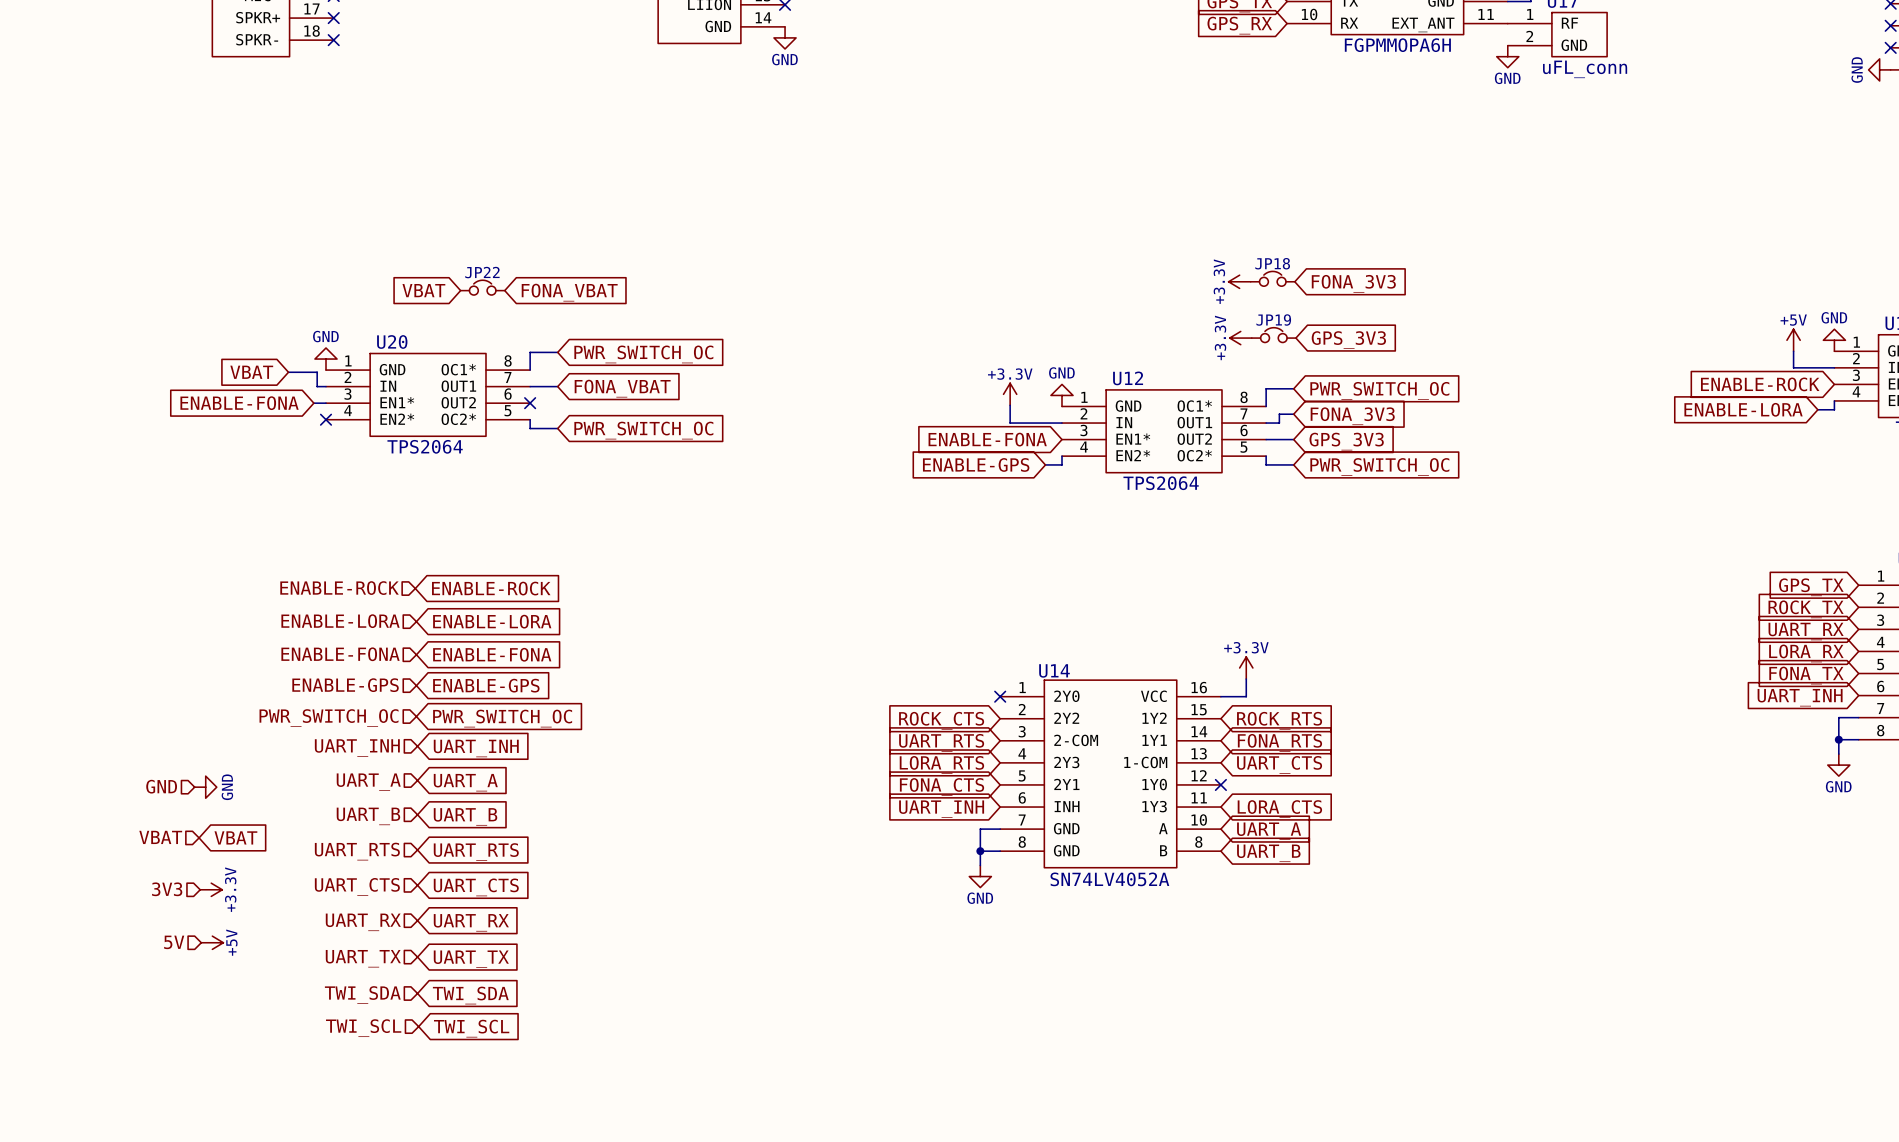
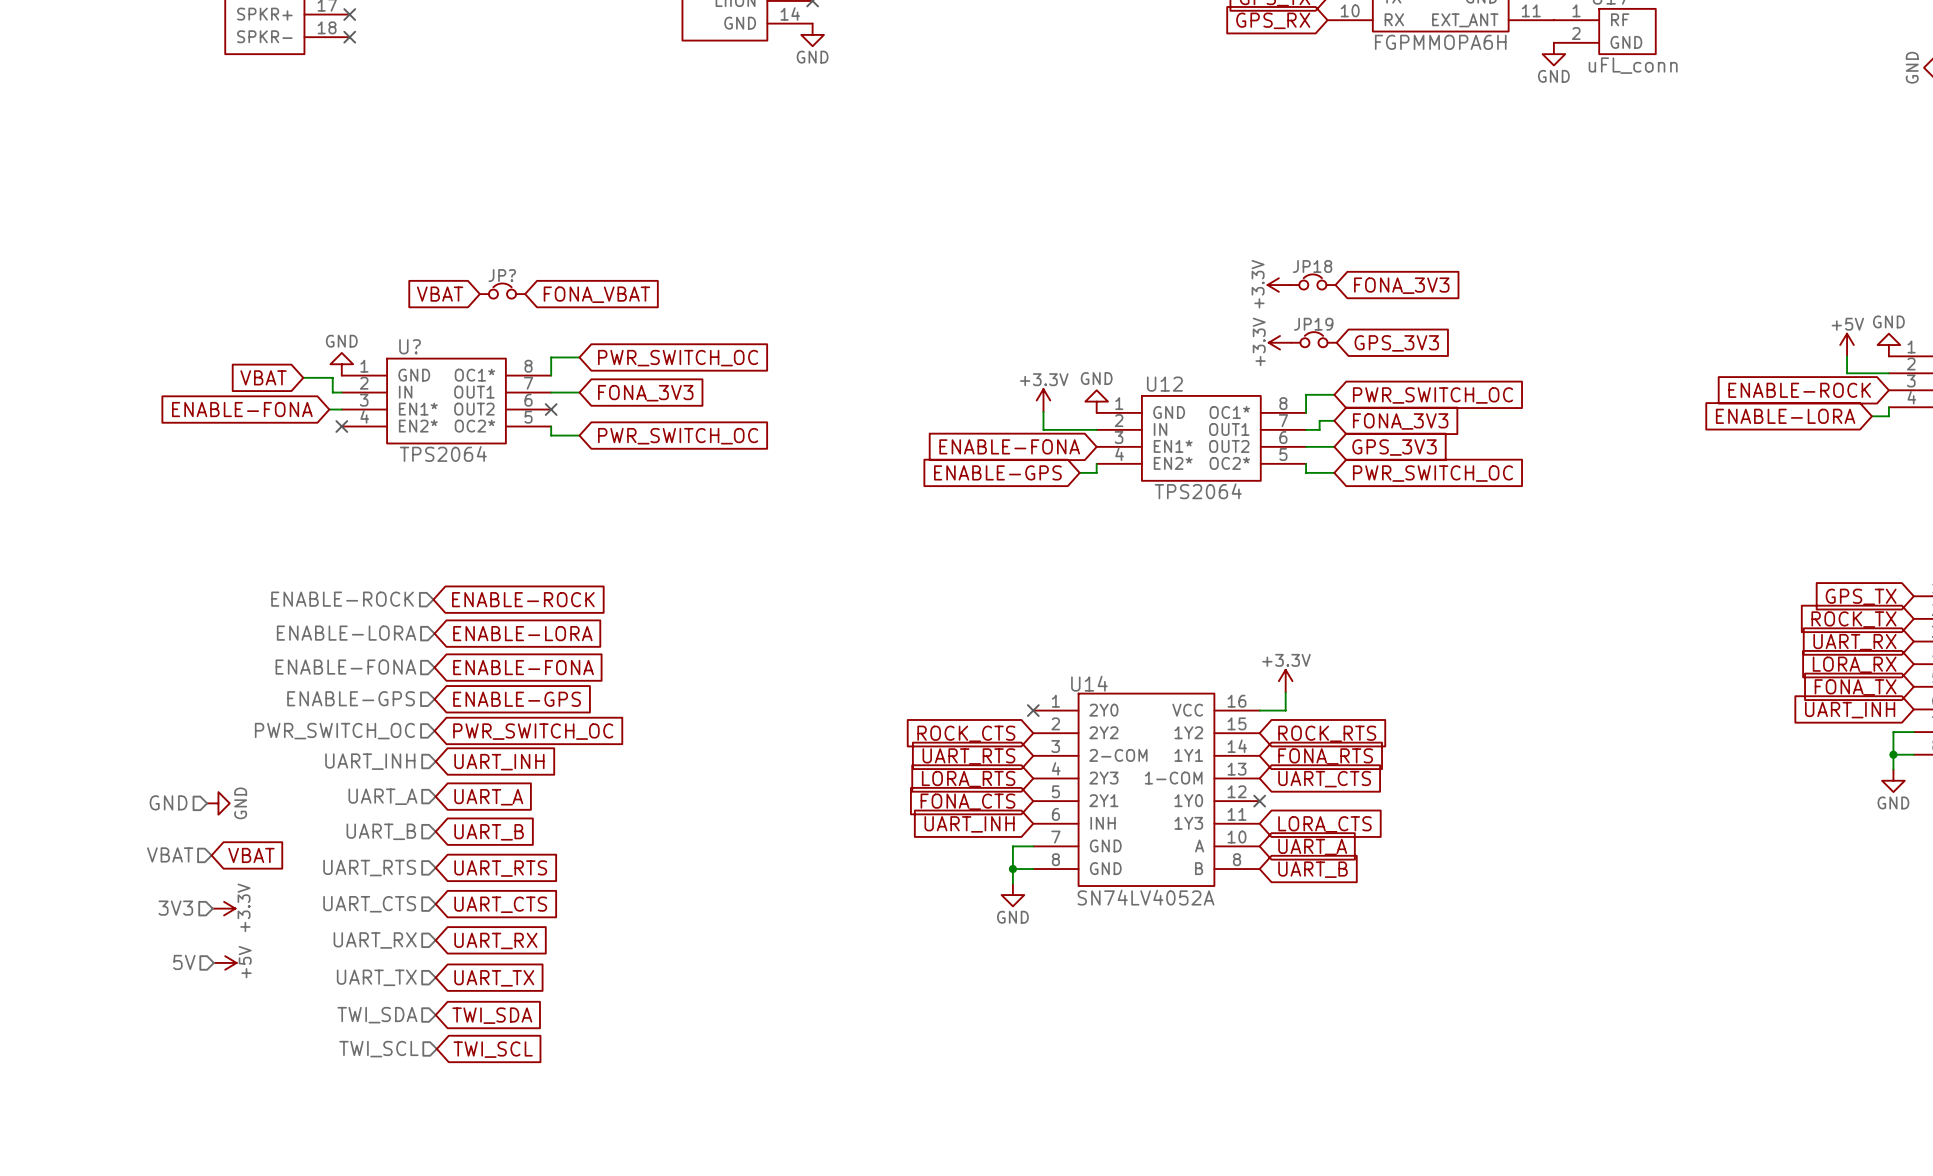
JP22 name: JP22 (482, 272) -> JP? (502, 275)
U20 name: U20 (392, 341) -> U? (410, 346)
global label: FONA_VBAT (622, 388) -> FONA_3V3 (645, 393)

